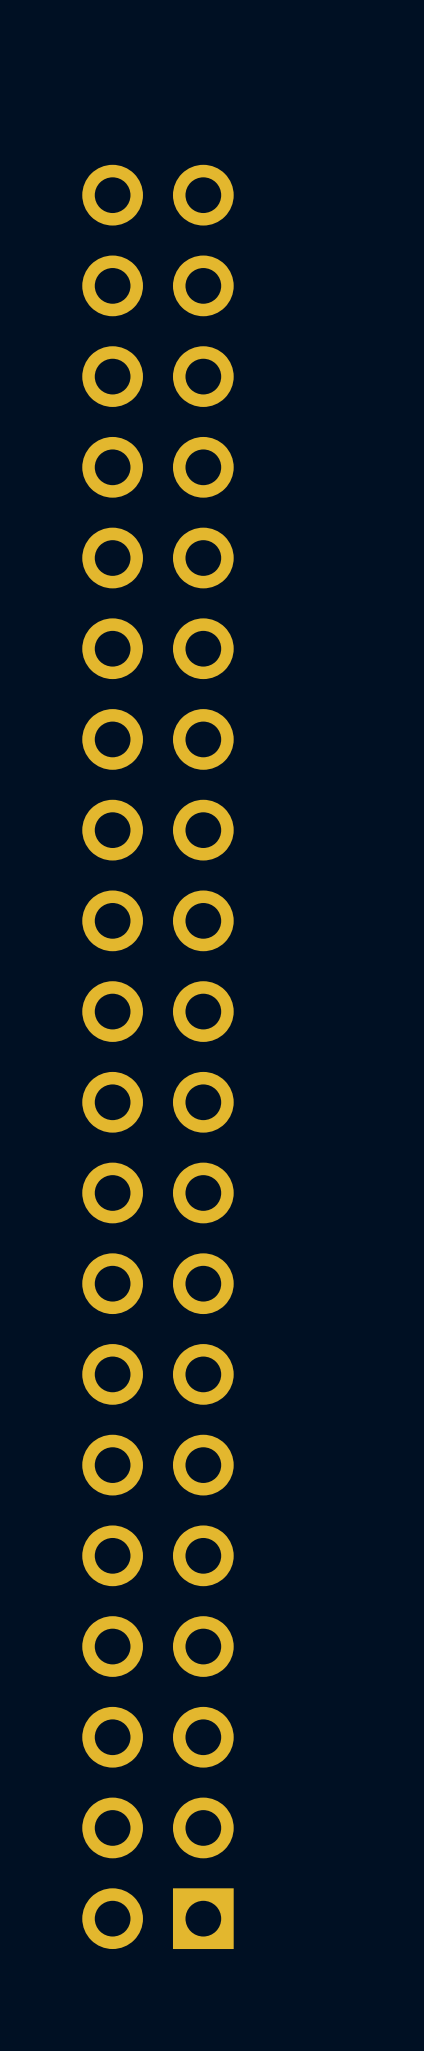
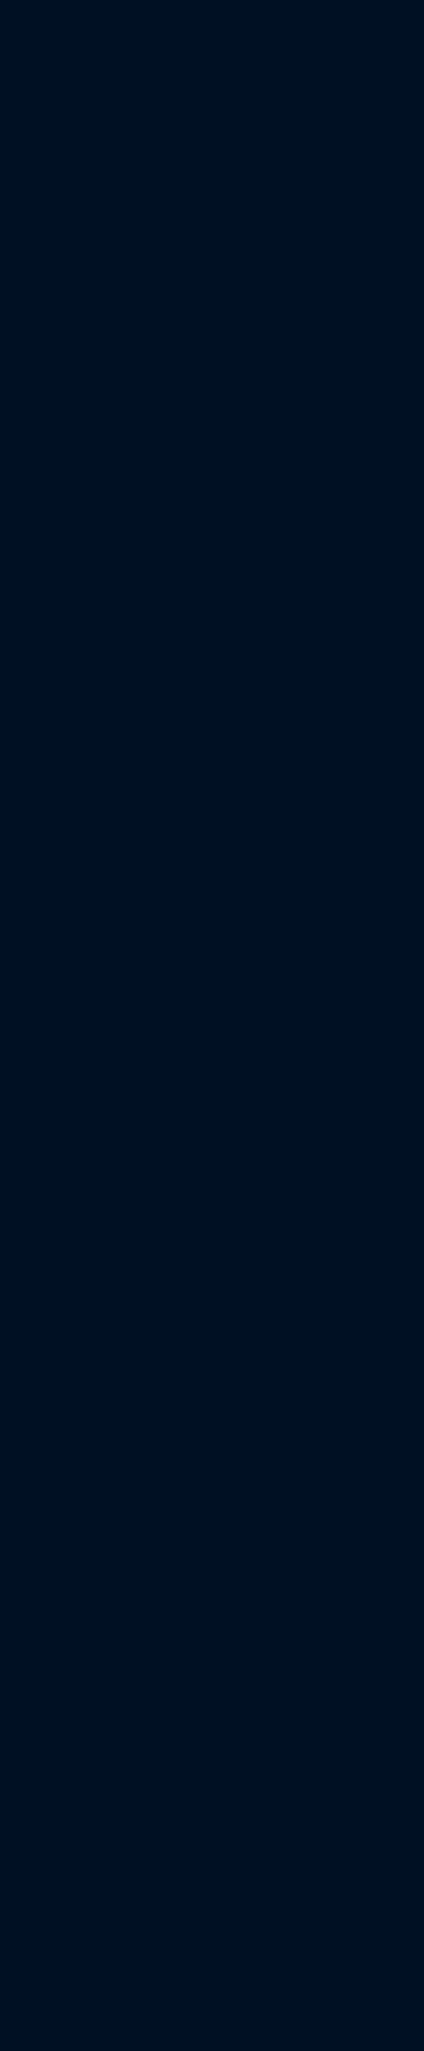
part: (157, 1056) -> none

